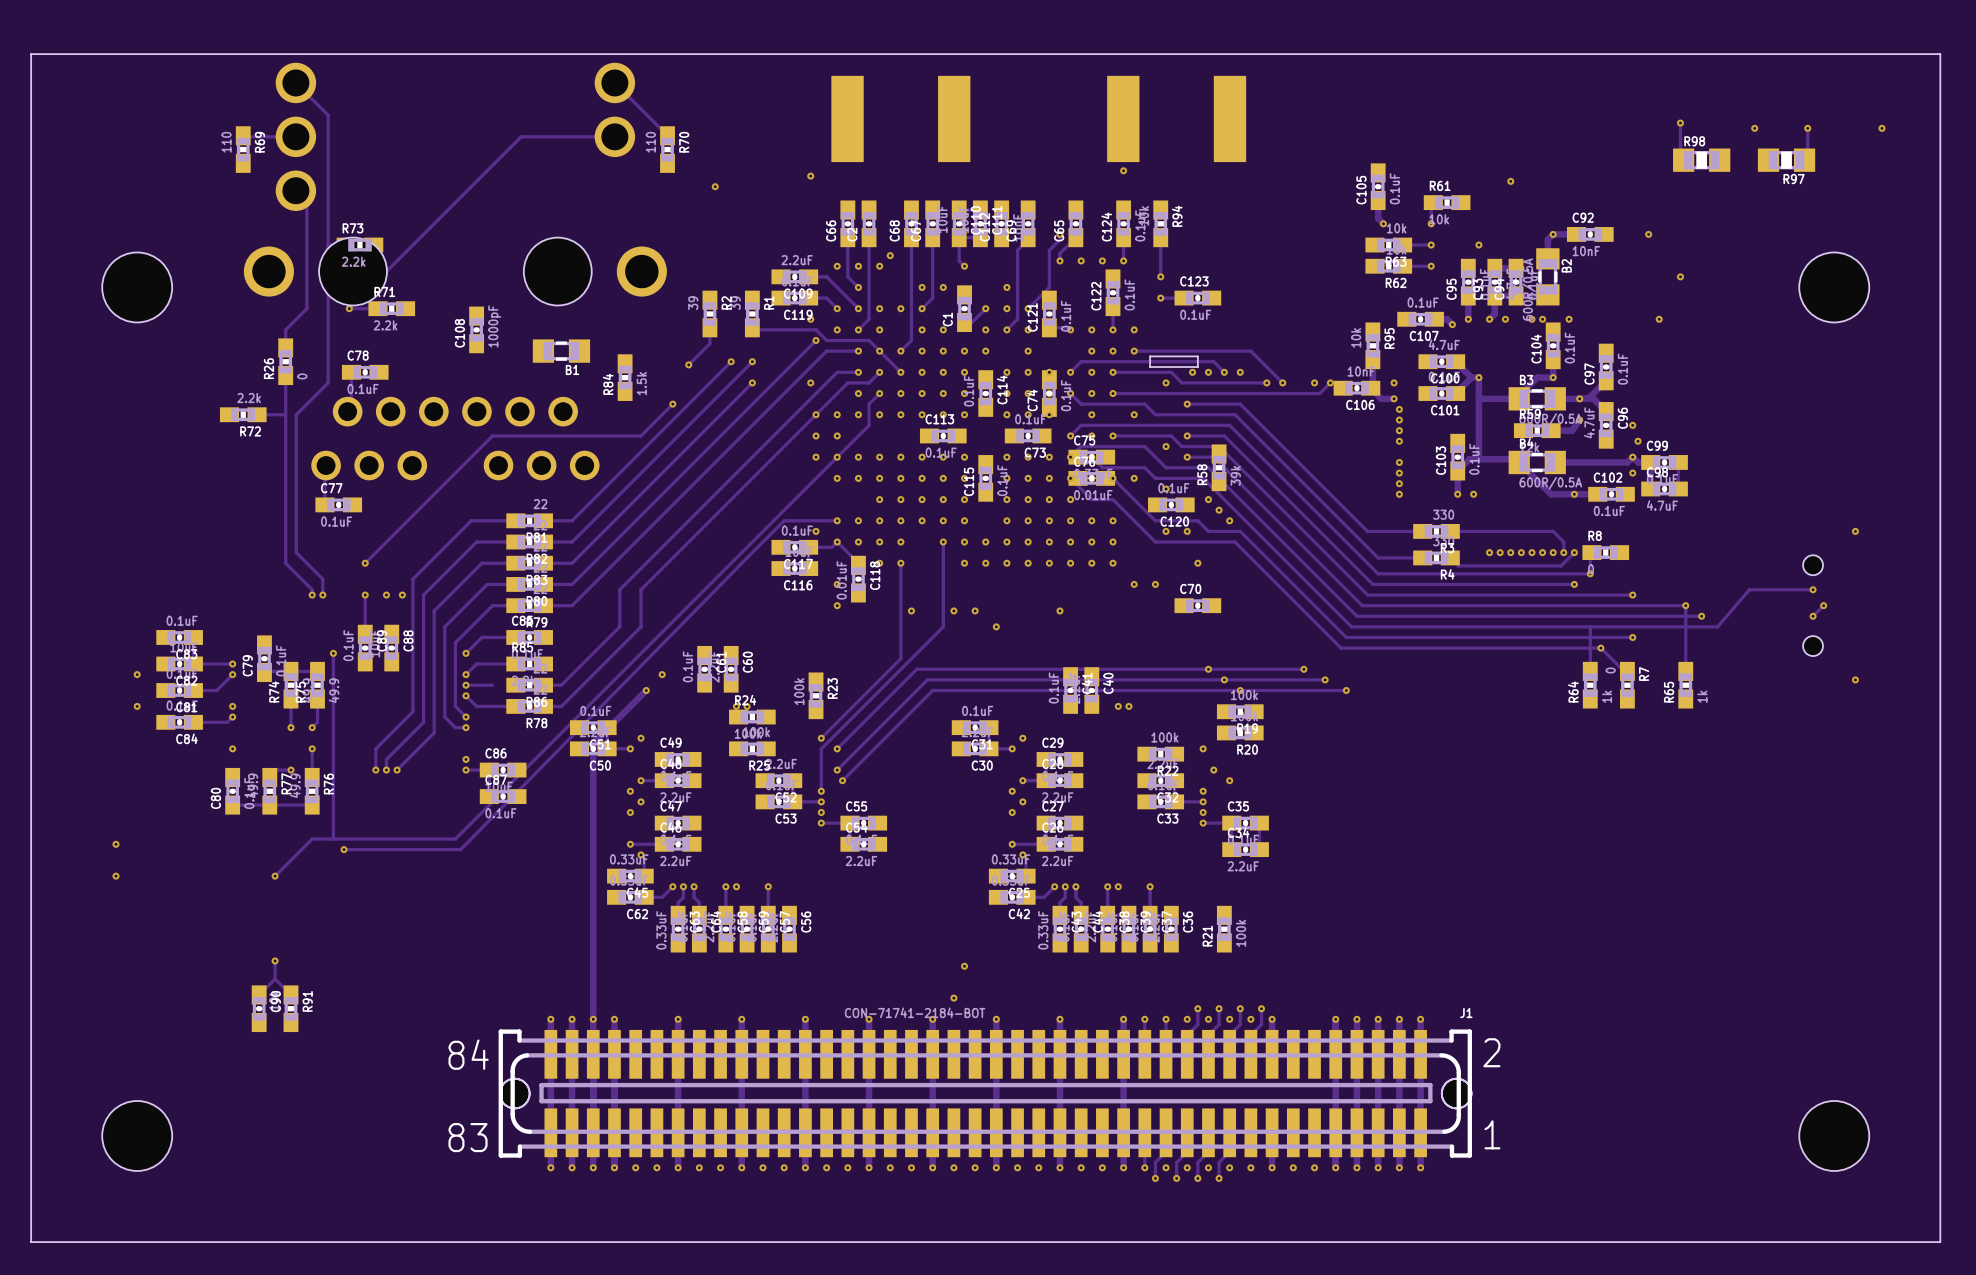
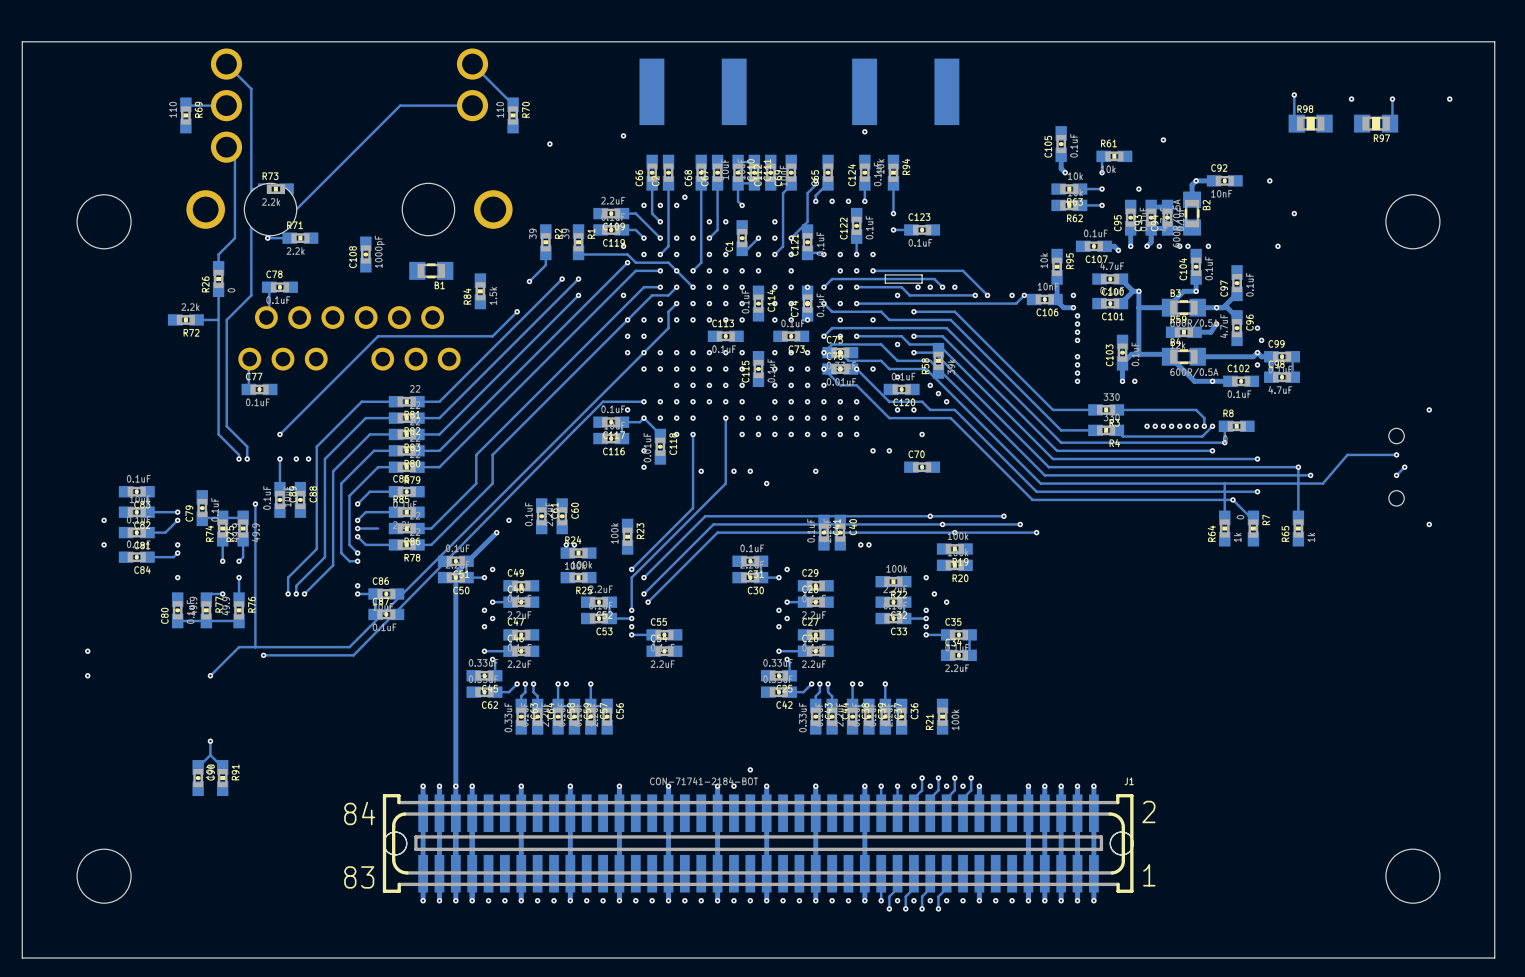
via: (964, 966) -> none
via: (953, 998) -> none
via: none -> (750, 769)
via: none -> (733, 786)

